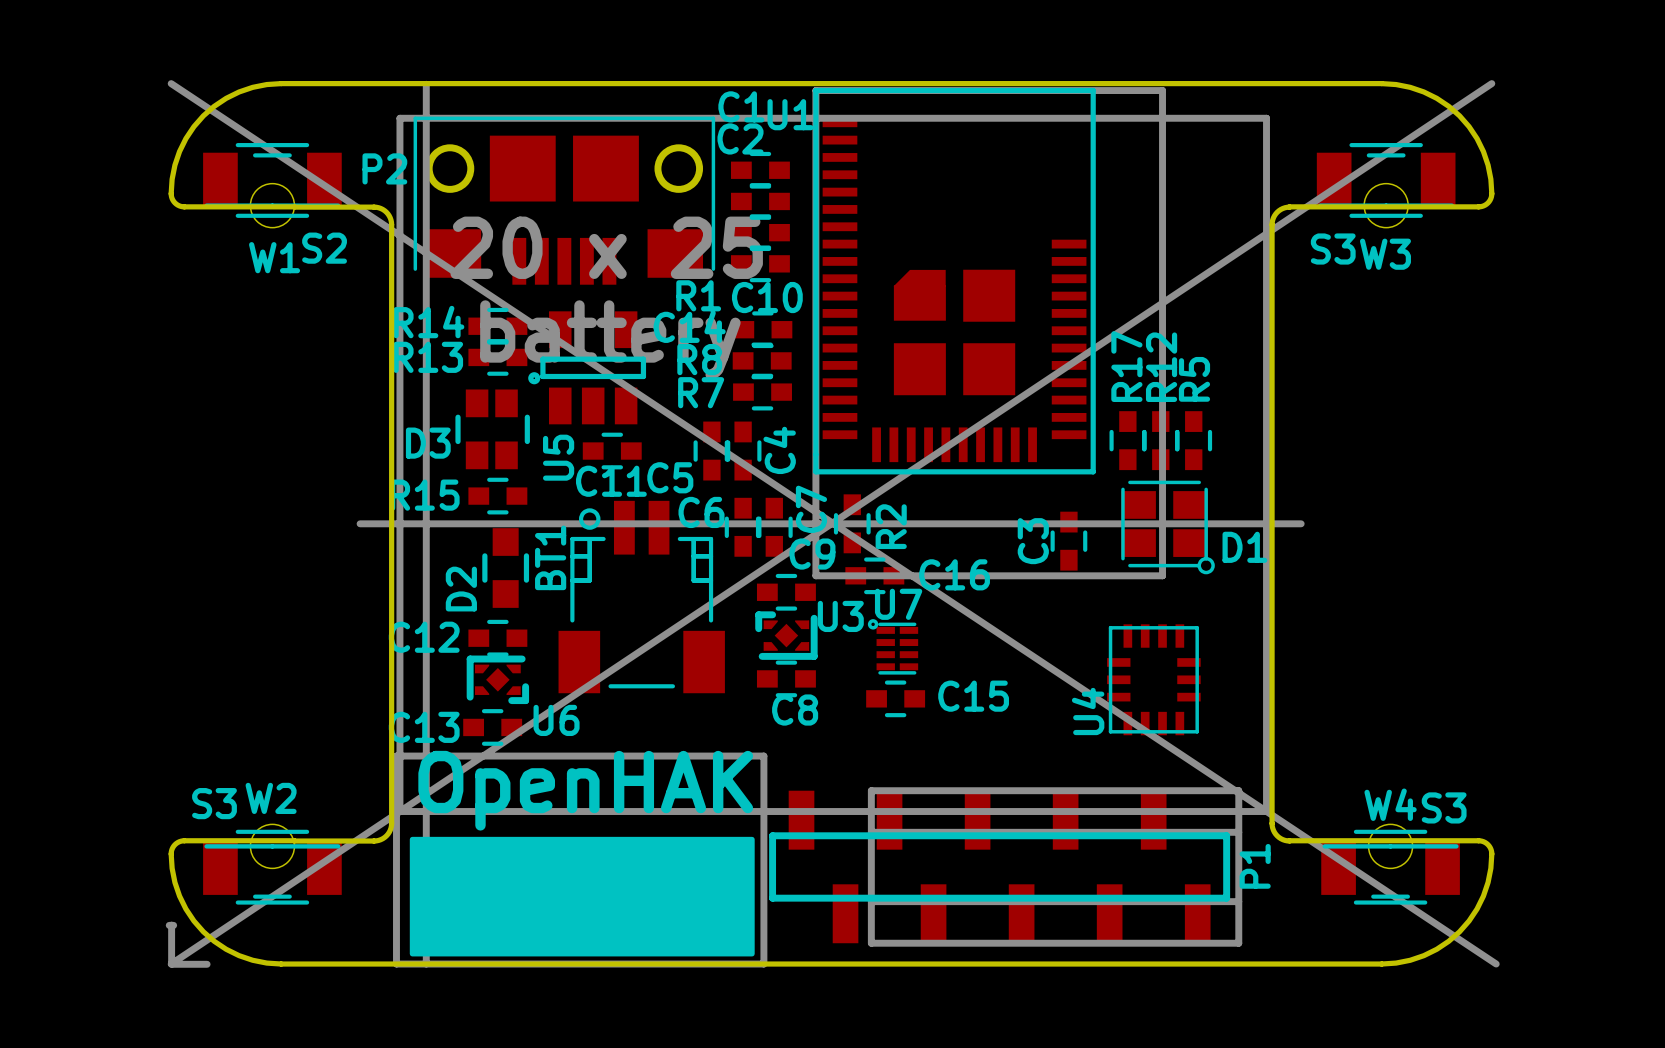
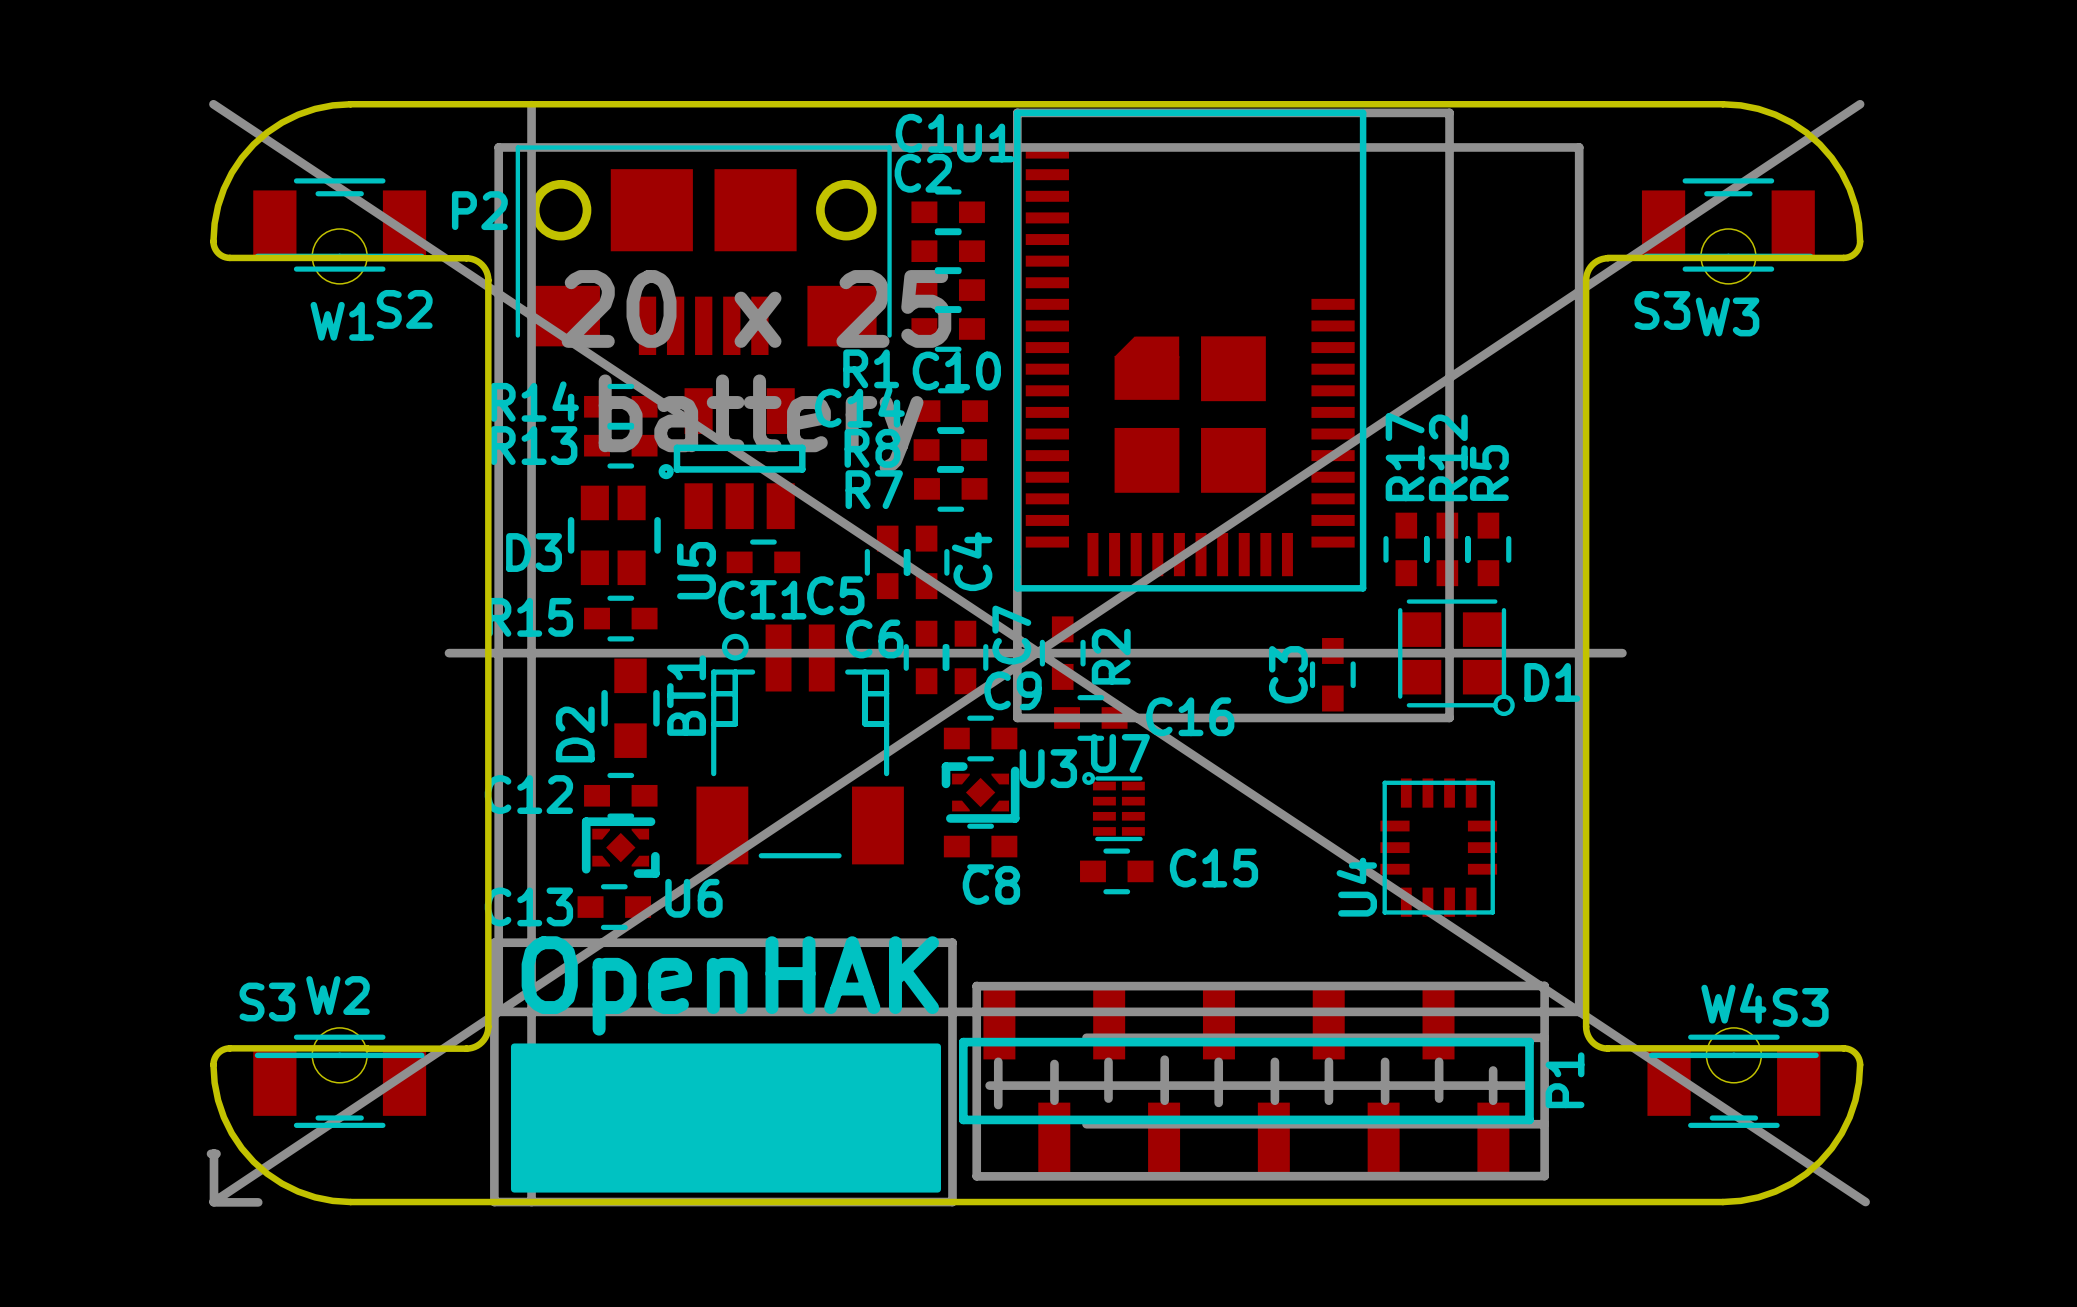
line: none -> (976, 985) (976, 1176)
line: (1238, 790) (871, 790) (871, 943) (1238, 943) -> (1544, 985) (976, 986)
line: none -> (1164, 1059) (1164, 1100)
line: none -> (998, 1061) (998, 1105)
line: none -> (1108, 1061) (1108, 1098)
line: none -> (1218, 1061) (1218, 1102)
line: none -> (1274, 1061) (1274, 1100)
line: none -> (1328, 1061) (1328, 1100)
line: none -> (1385, 1061) (1385, 1100)
line: none -> (1439, 1061) (1439, 1098)
line: none -> (1054, 1063) (1054, 1100)
line: none -> (1493, 1070) (1493, 1100)
line: none -> (989, 1085) (1525, 1085)
line: none -> (1544, 1176) (976, 1176)

